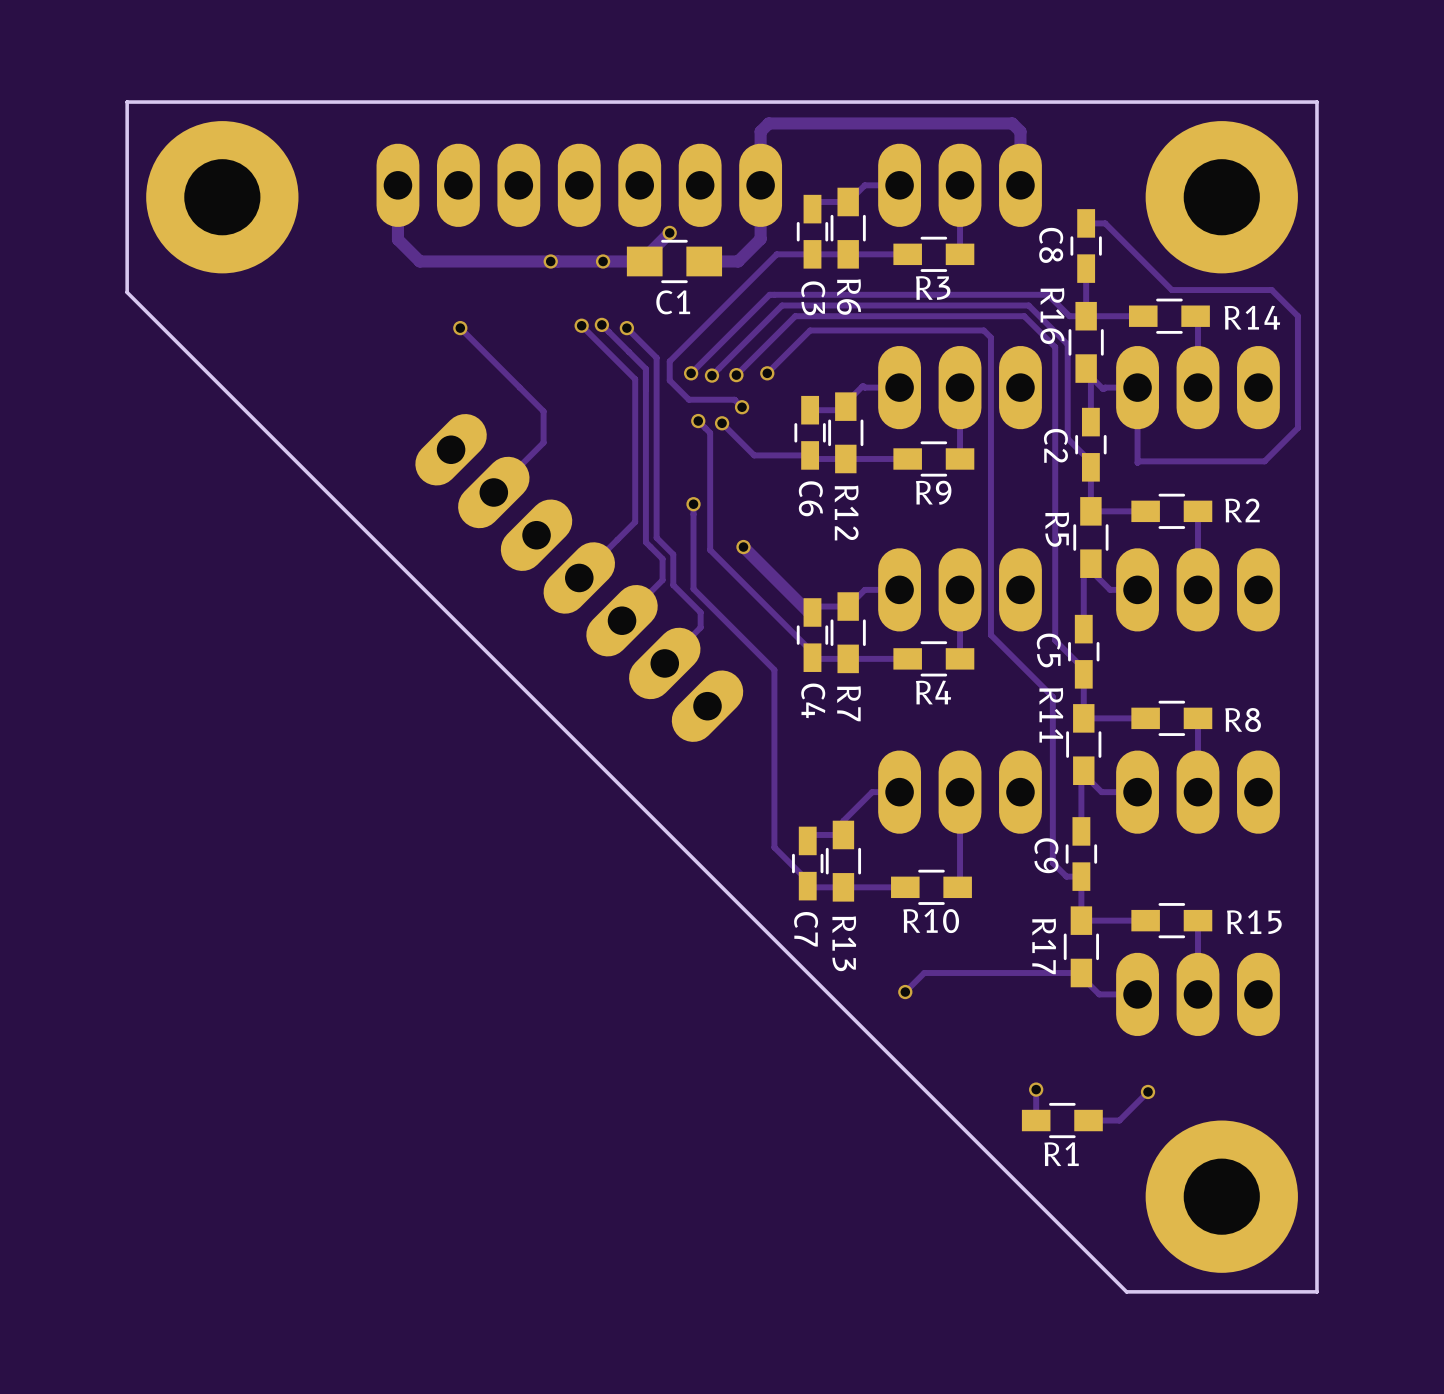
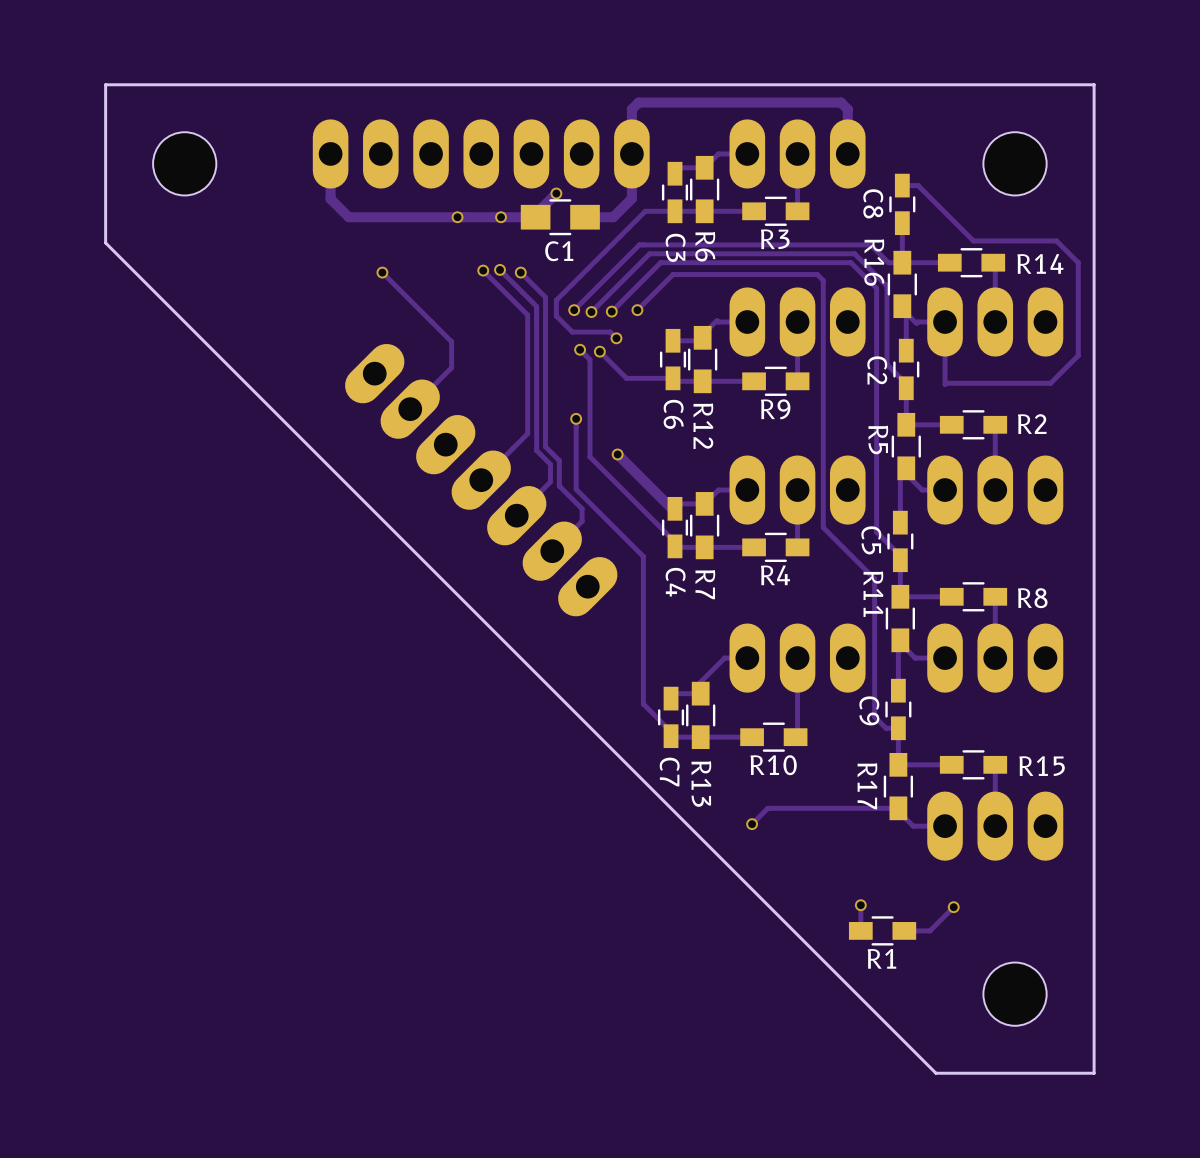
part footprint: [146, 121, 299, 274] -> [153, 132, 217, 196]
part footprint: [1145, 121, 1298, 274] -> [983, 132, 1047, 196]
part footprint: [1145, 1120, 1298, 1273] -> [983, 962, 1047, 1026]

